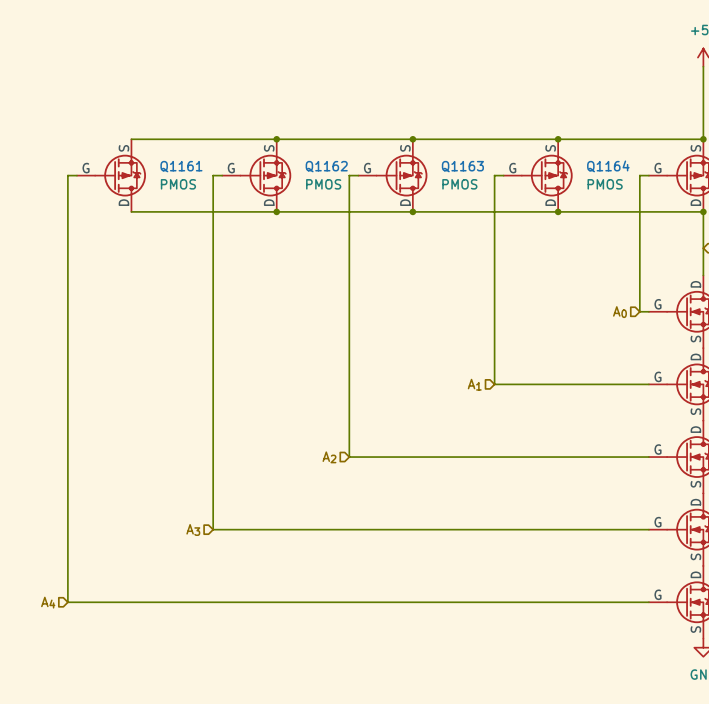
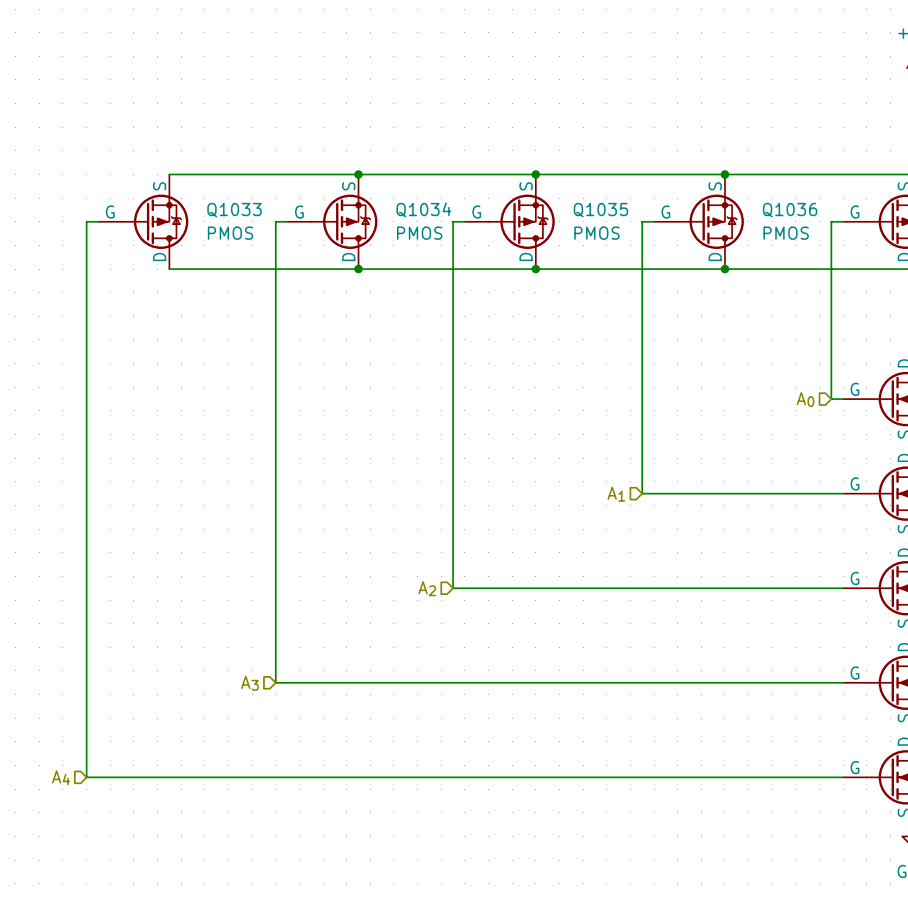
Q1161 name: Q1161 (181, 166) -> Q1033 (234, 210)
Q1162 name: Q1162 (326, 166) -> Q1034 (423, 209)
Q1163 name: Q1163 (462, 166) -> Q1035 (600, 210)
Q1164 name: Q1164 (608, 166) -> Q1036 (790, 210)

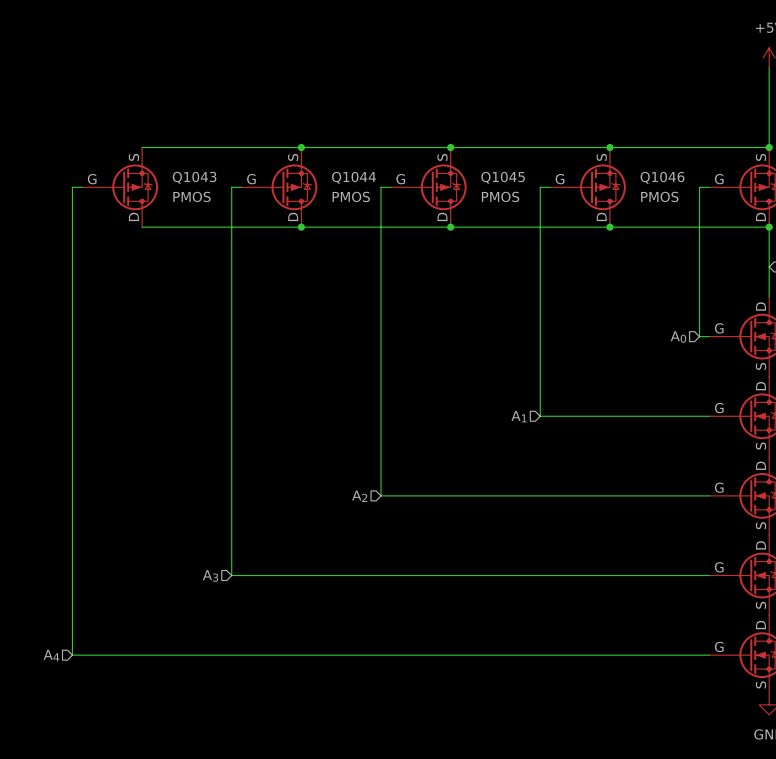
Q1034 name: Q1034 (423, 209) -> Q1044 (353, 177)
Q1033 name: Q1033 (234, 210) -> Q1043 (194, 177)
Q1035 name: Q1035 (600, 210) -> Q1045 (503, 177)
Q1036 name: Q1036 (790, 210) -> Q1046 (662, 177)

